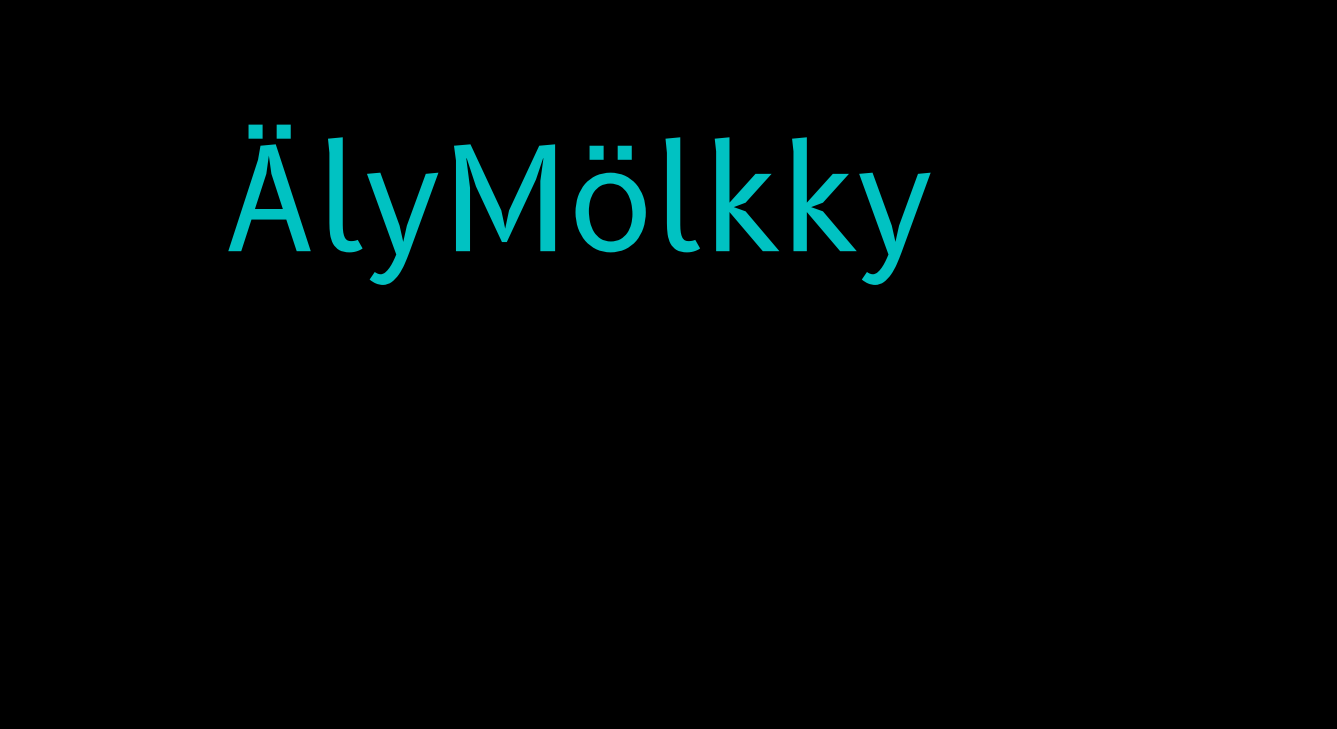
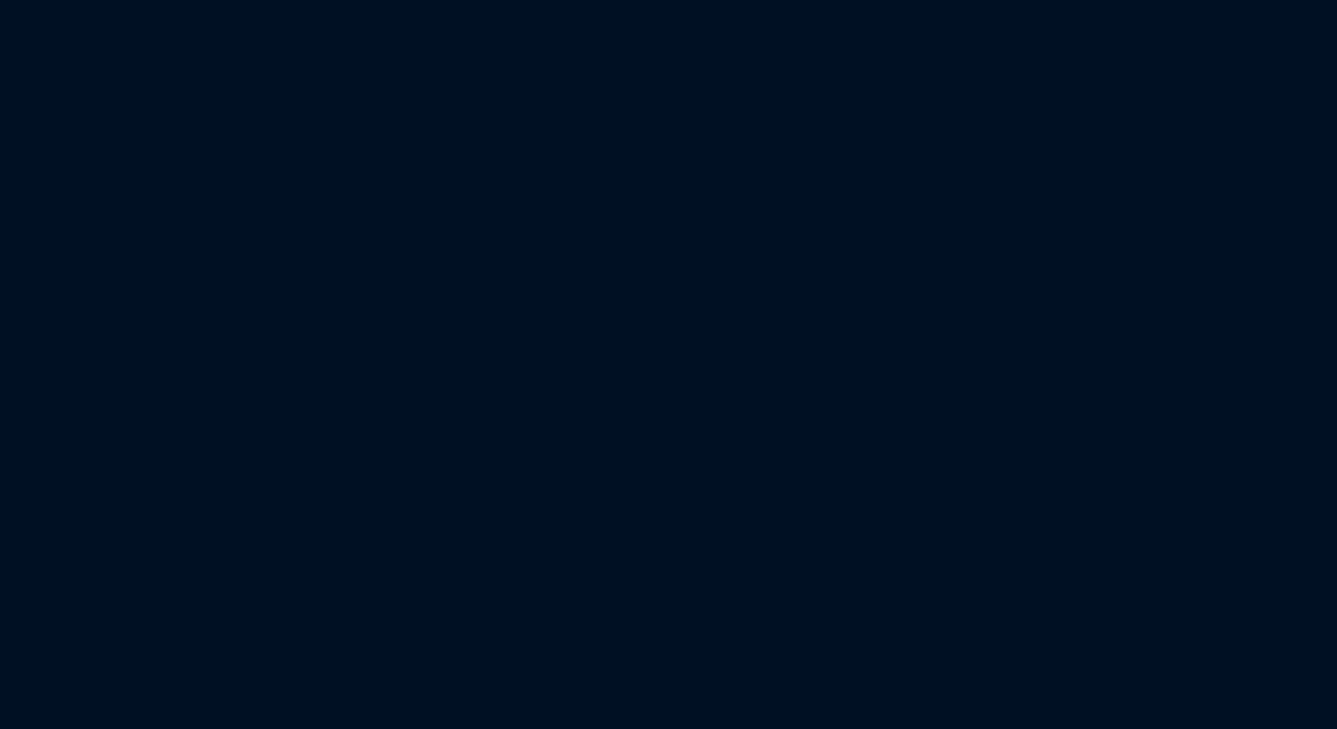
text: ÄlyMölkky (579, 204) -> none

